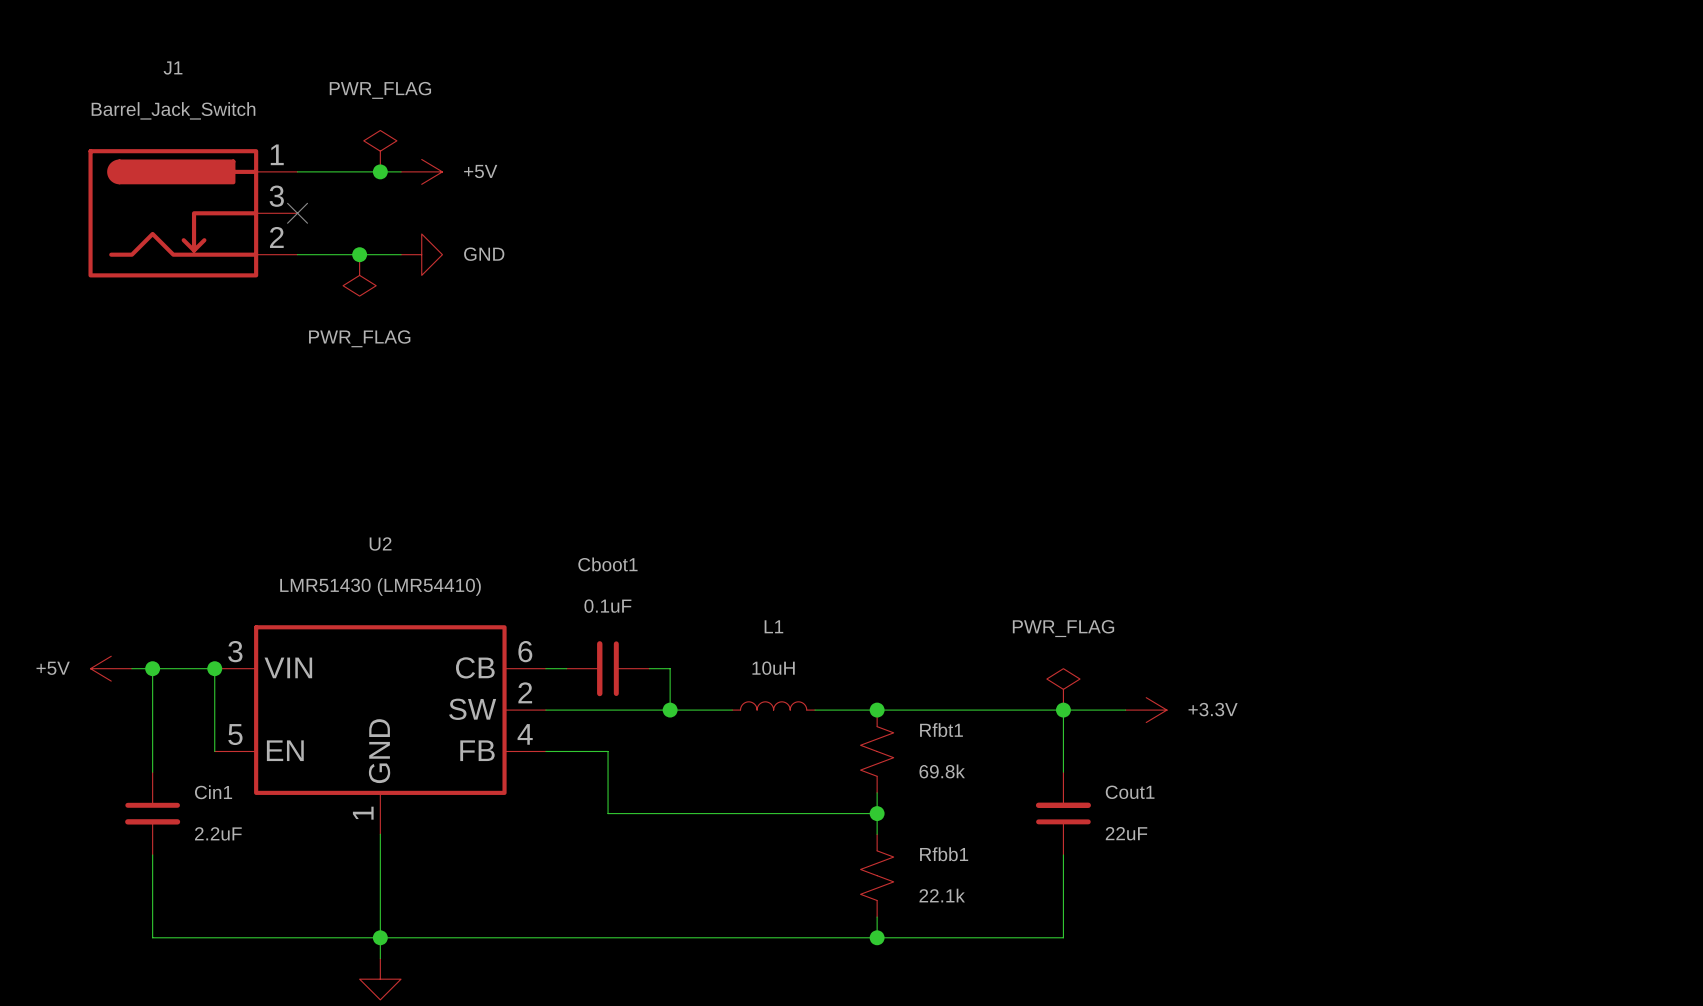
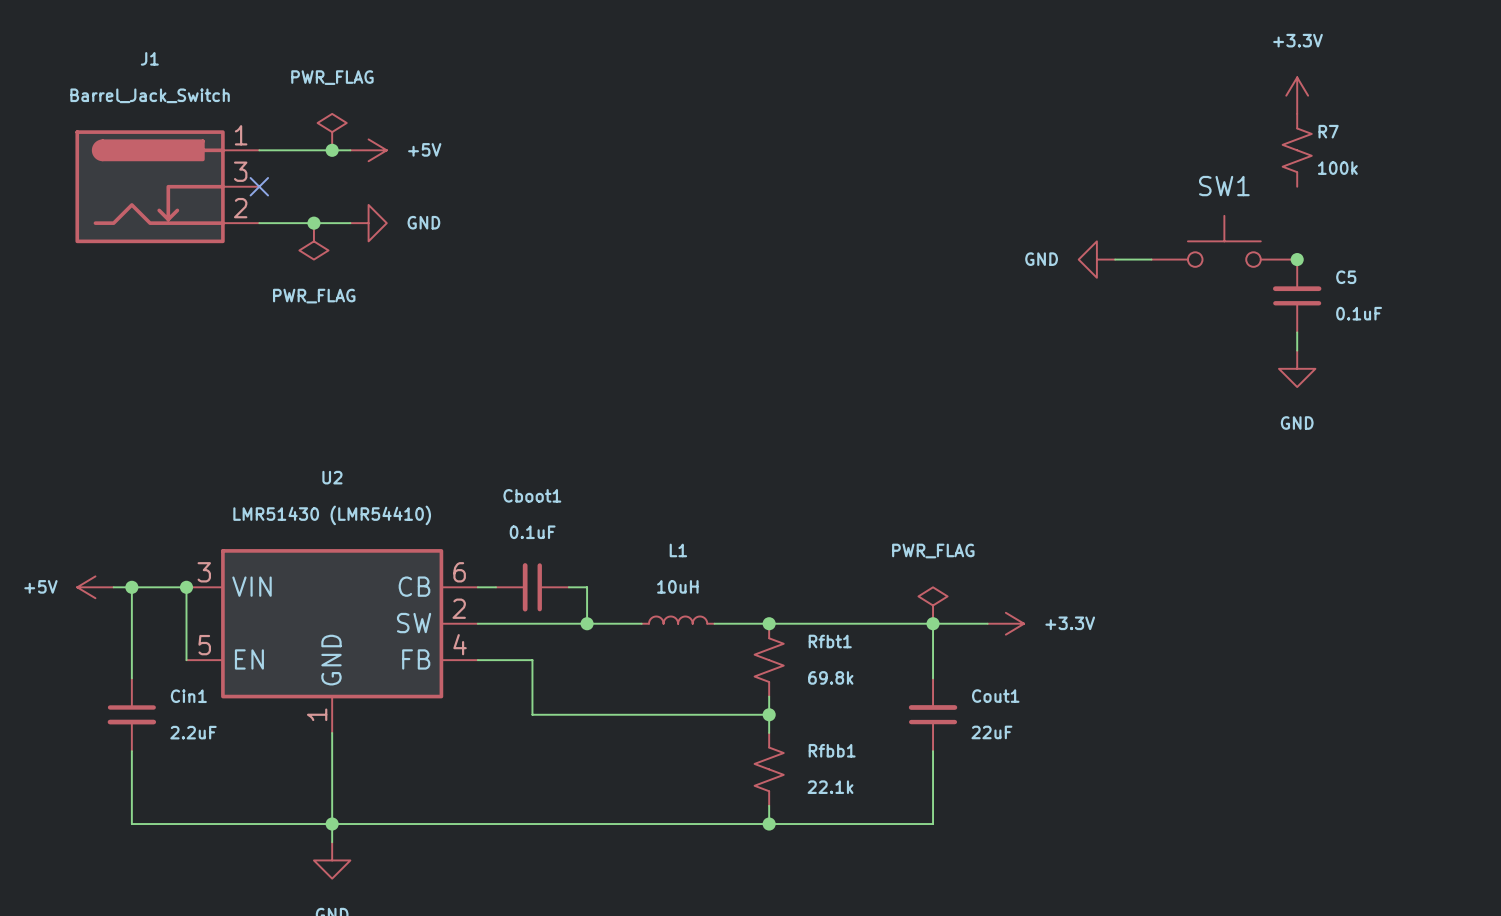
power symbol: none -> +3.3V (1297, 95)
R7: none -> 100k (1297, 150)
SW1: none -> (1224, 241)
power symbol: none -> GND (1096, 259)
wire: none -> (1115, 259) (1151, 259)
junction: none -> (1297, 259)
C5: none -> 0.1uF (1297, 295)
wire: none -> (1297, 332) (1297, 350)
power symbol: none -> GND (1297, 368)

